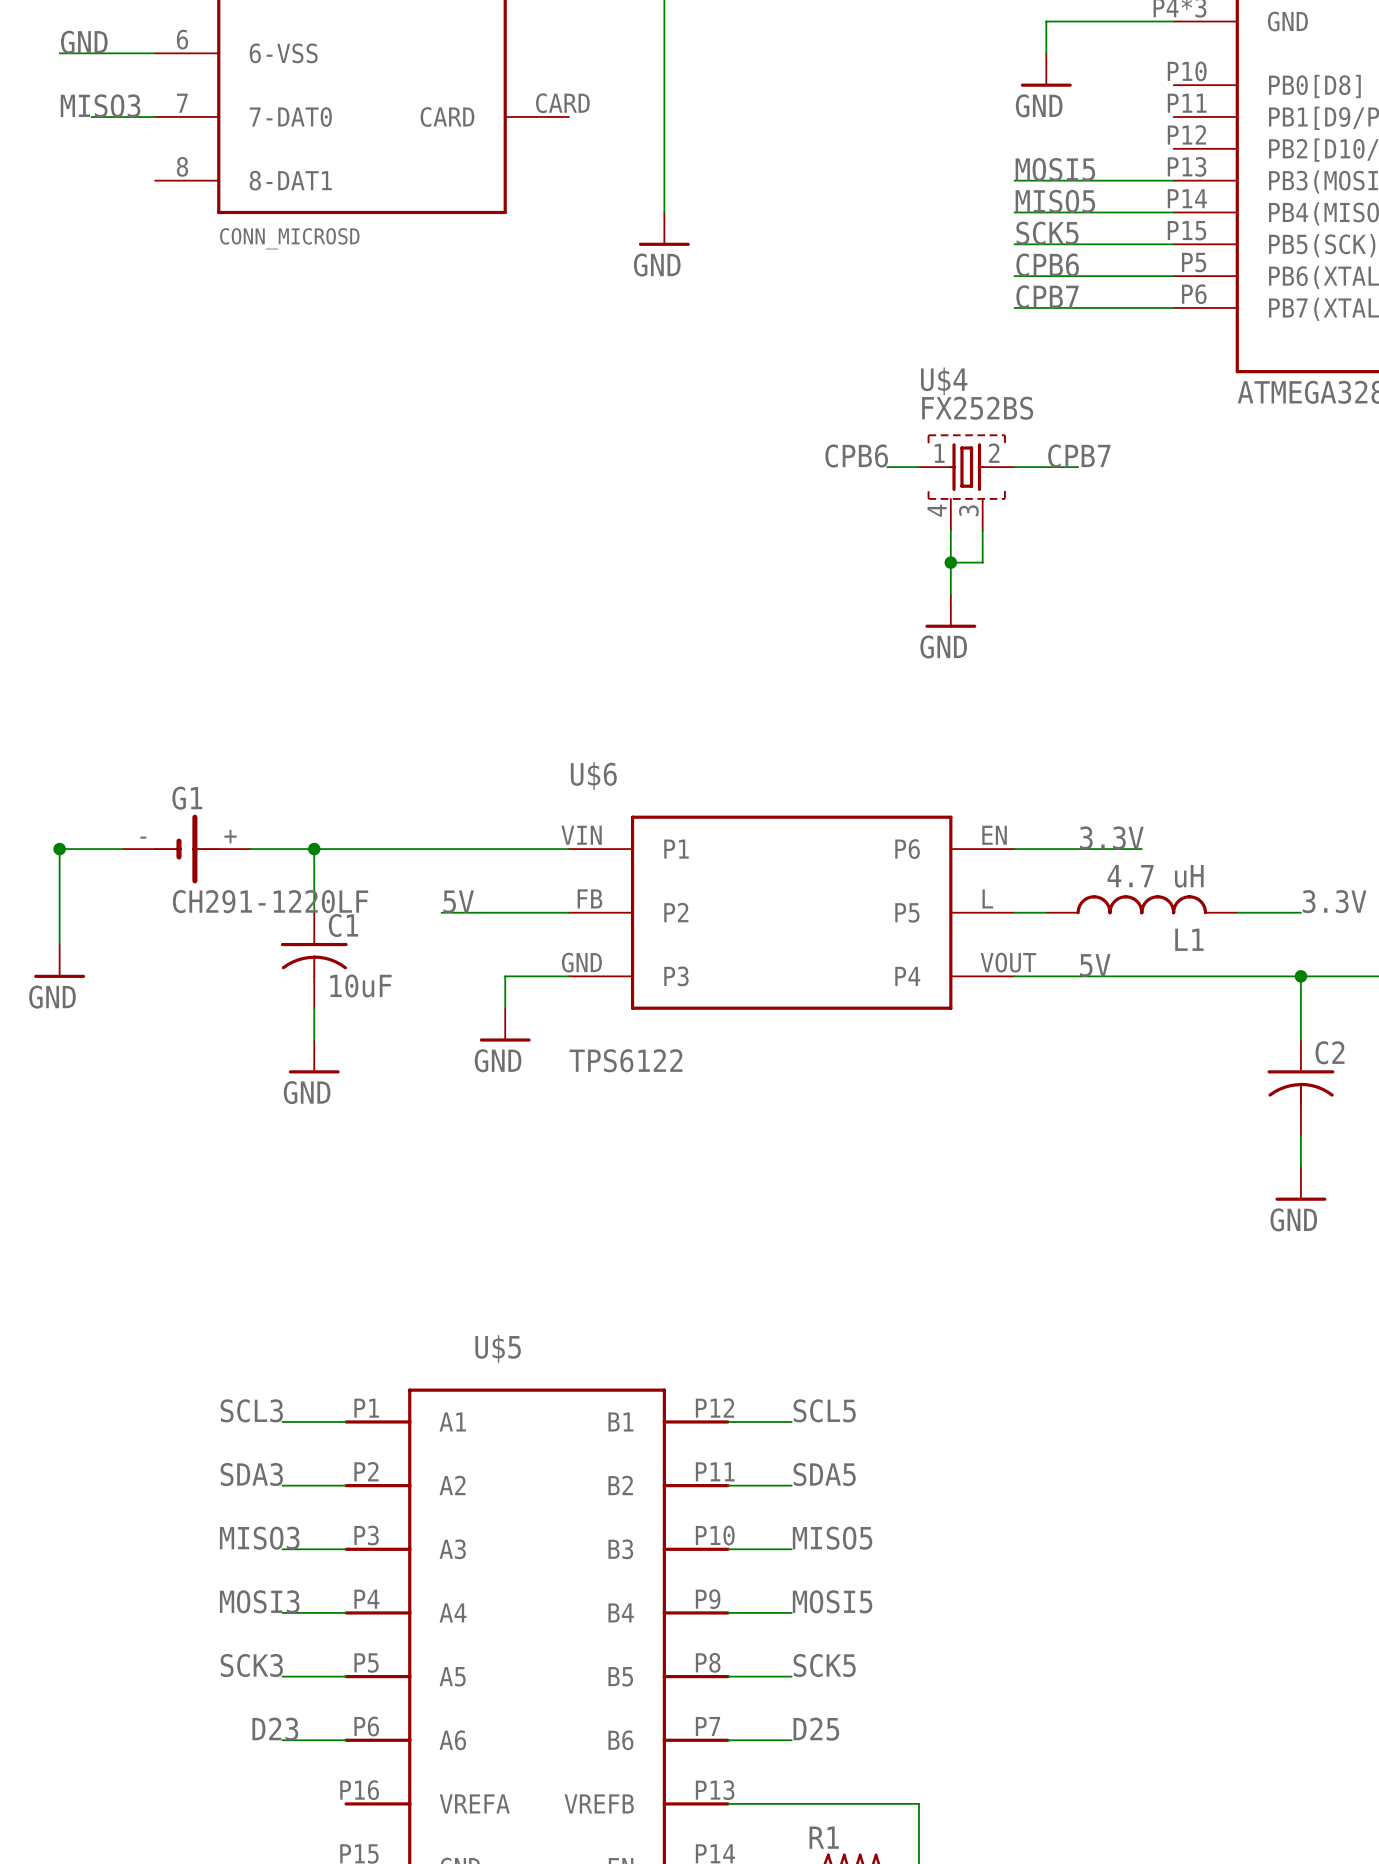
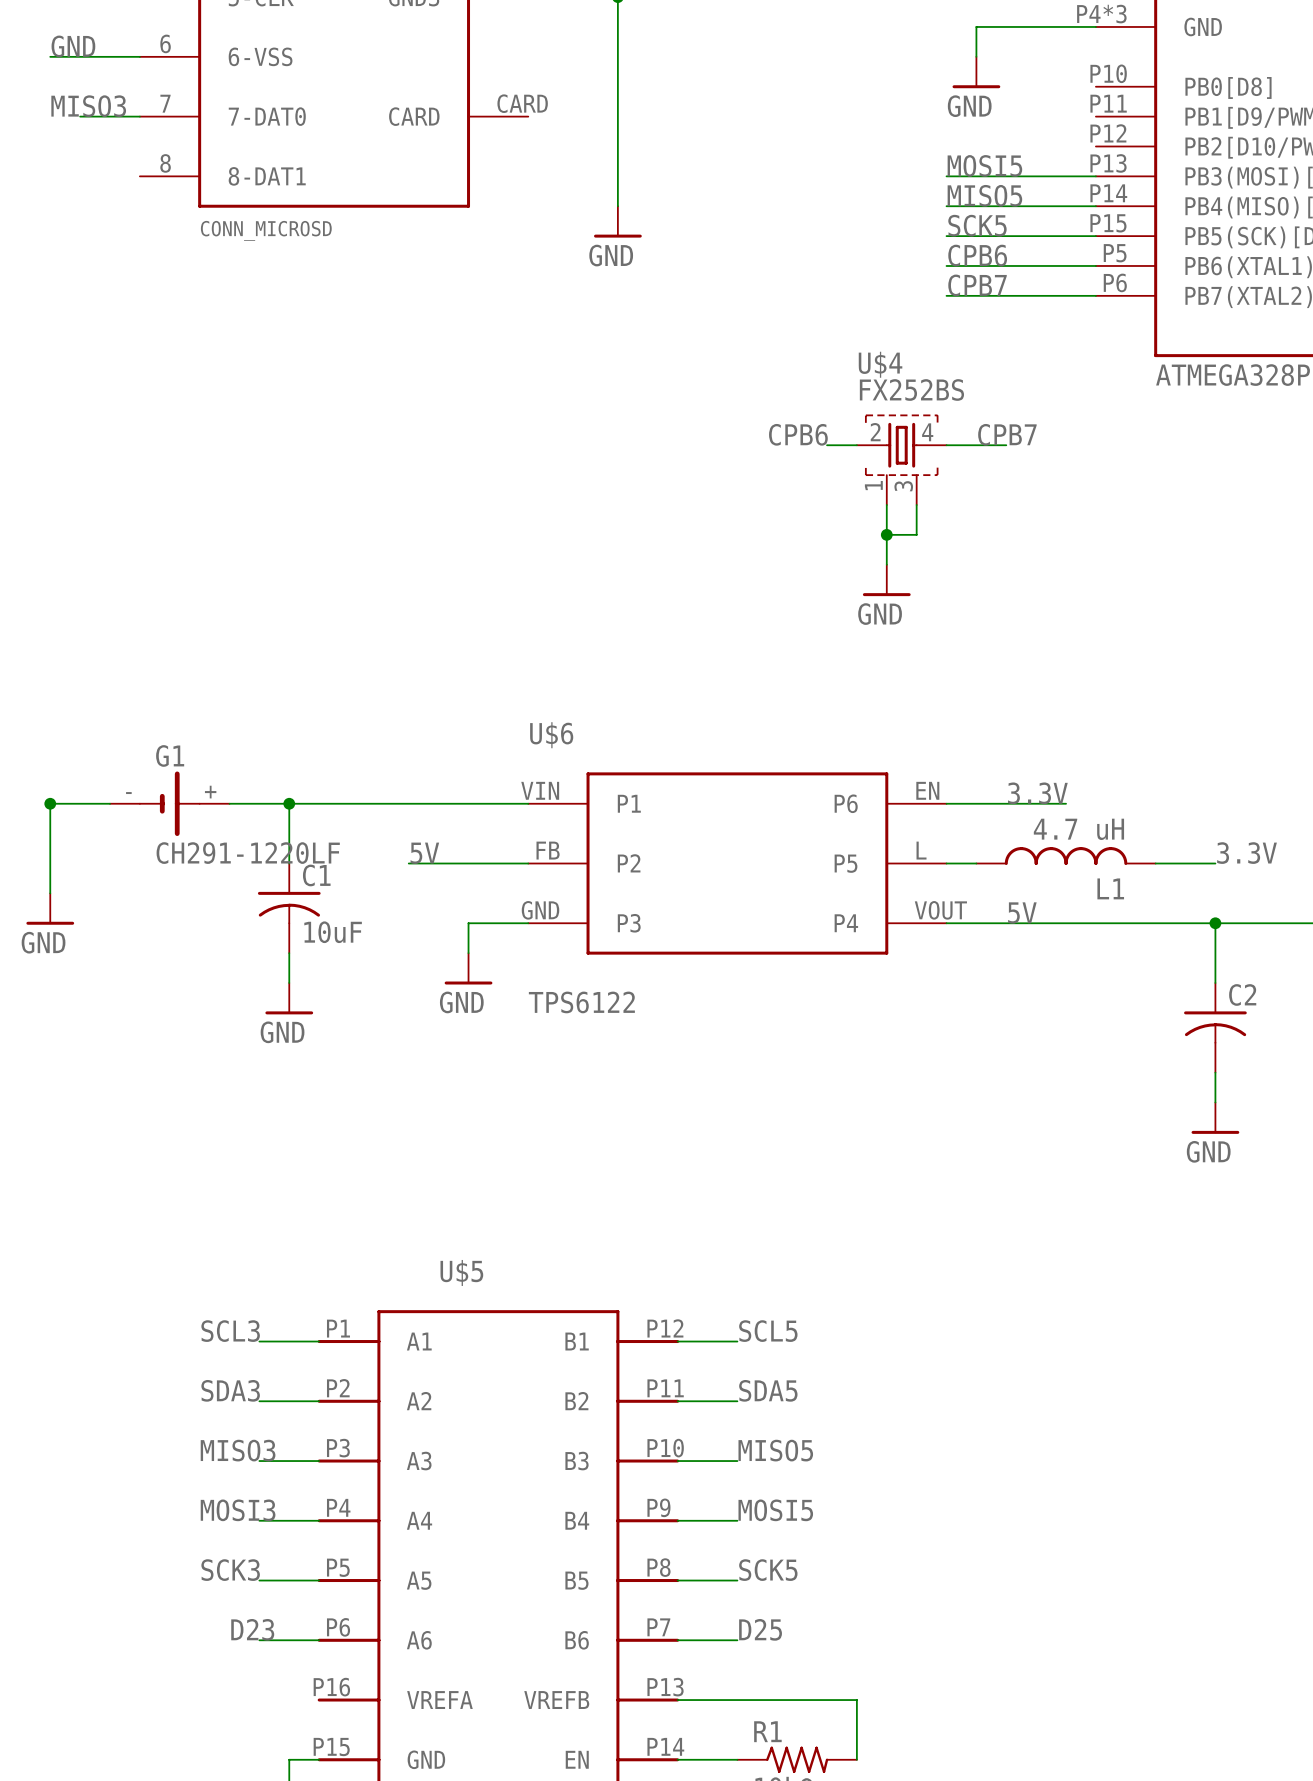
U$4 pin number: 1 (939, 453) -> 2 (875, 432)
U$4 pin number: 2 (994, 453) -> 4 (927, 432)
U$4 pin number: 4 (937, 510) -> 1 (873, 485)

